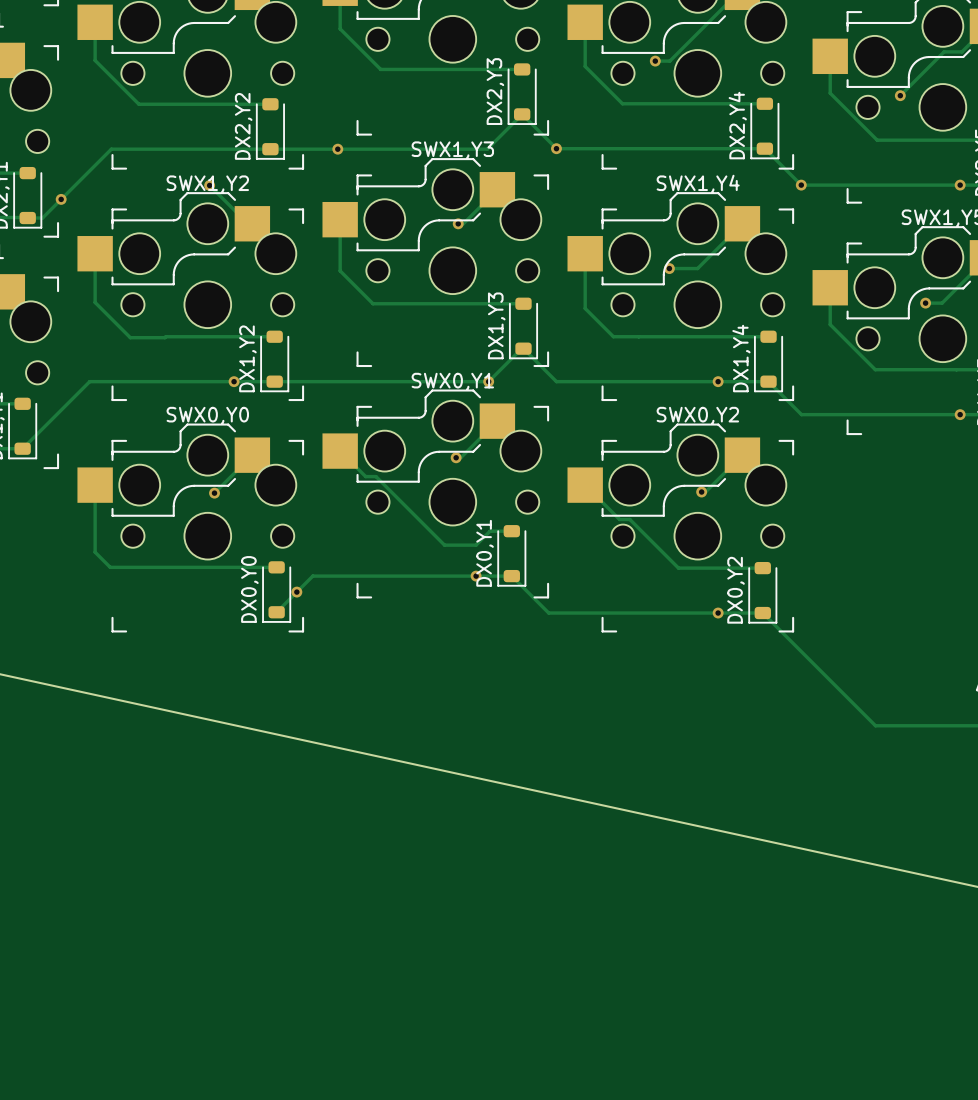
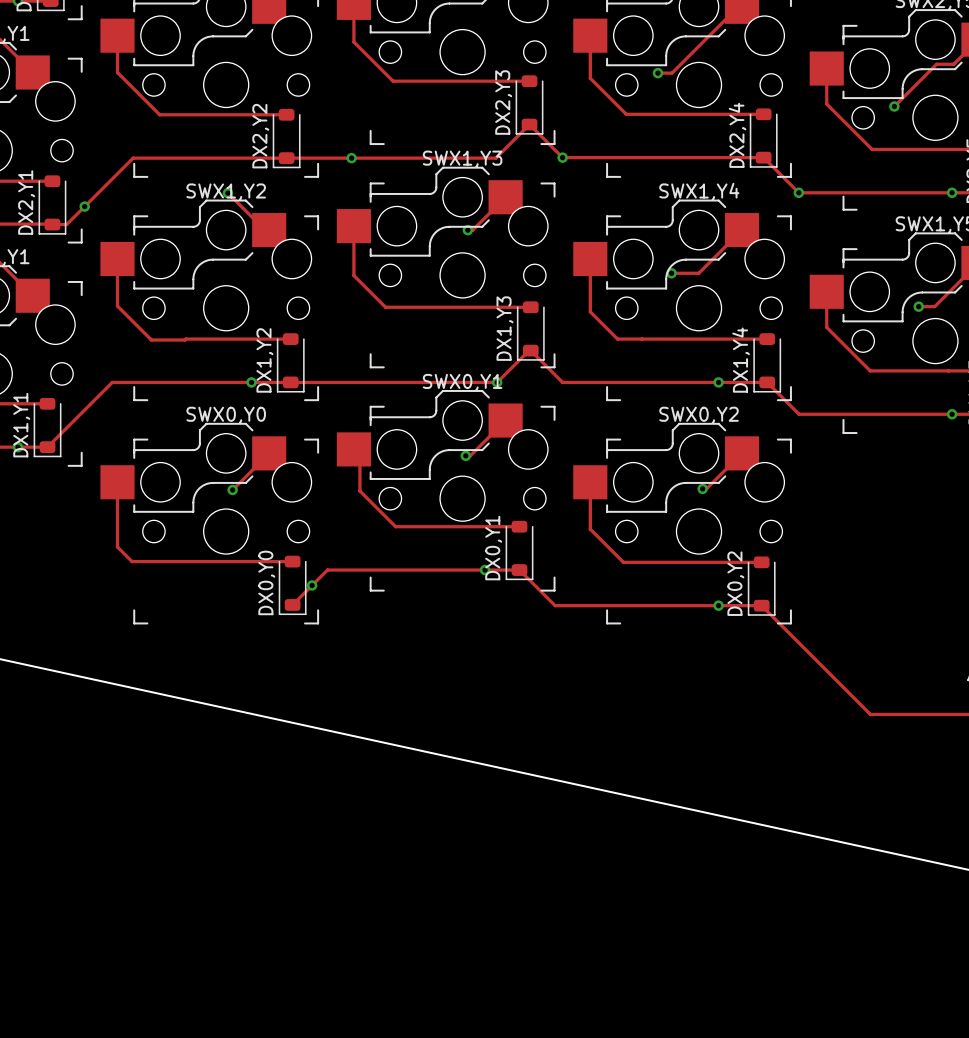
track: (346, 457) (365, 476) (376, 476) (444, 545) (476, 545) (490, 531) -> (359, 455) (359, 491) (395, 526) (498, 526)
track: (585, 485) (619, 519) (629, 519) (678, 568) -> (576, 495) (590, 482) (590, 529) (623, 562) (680, 562)

